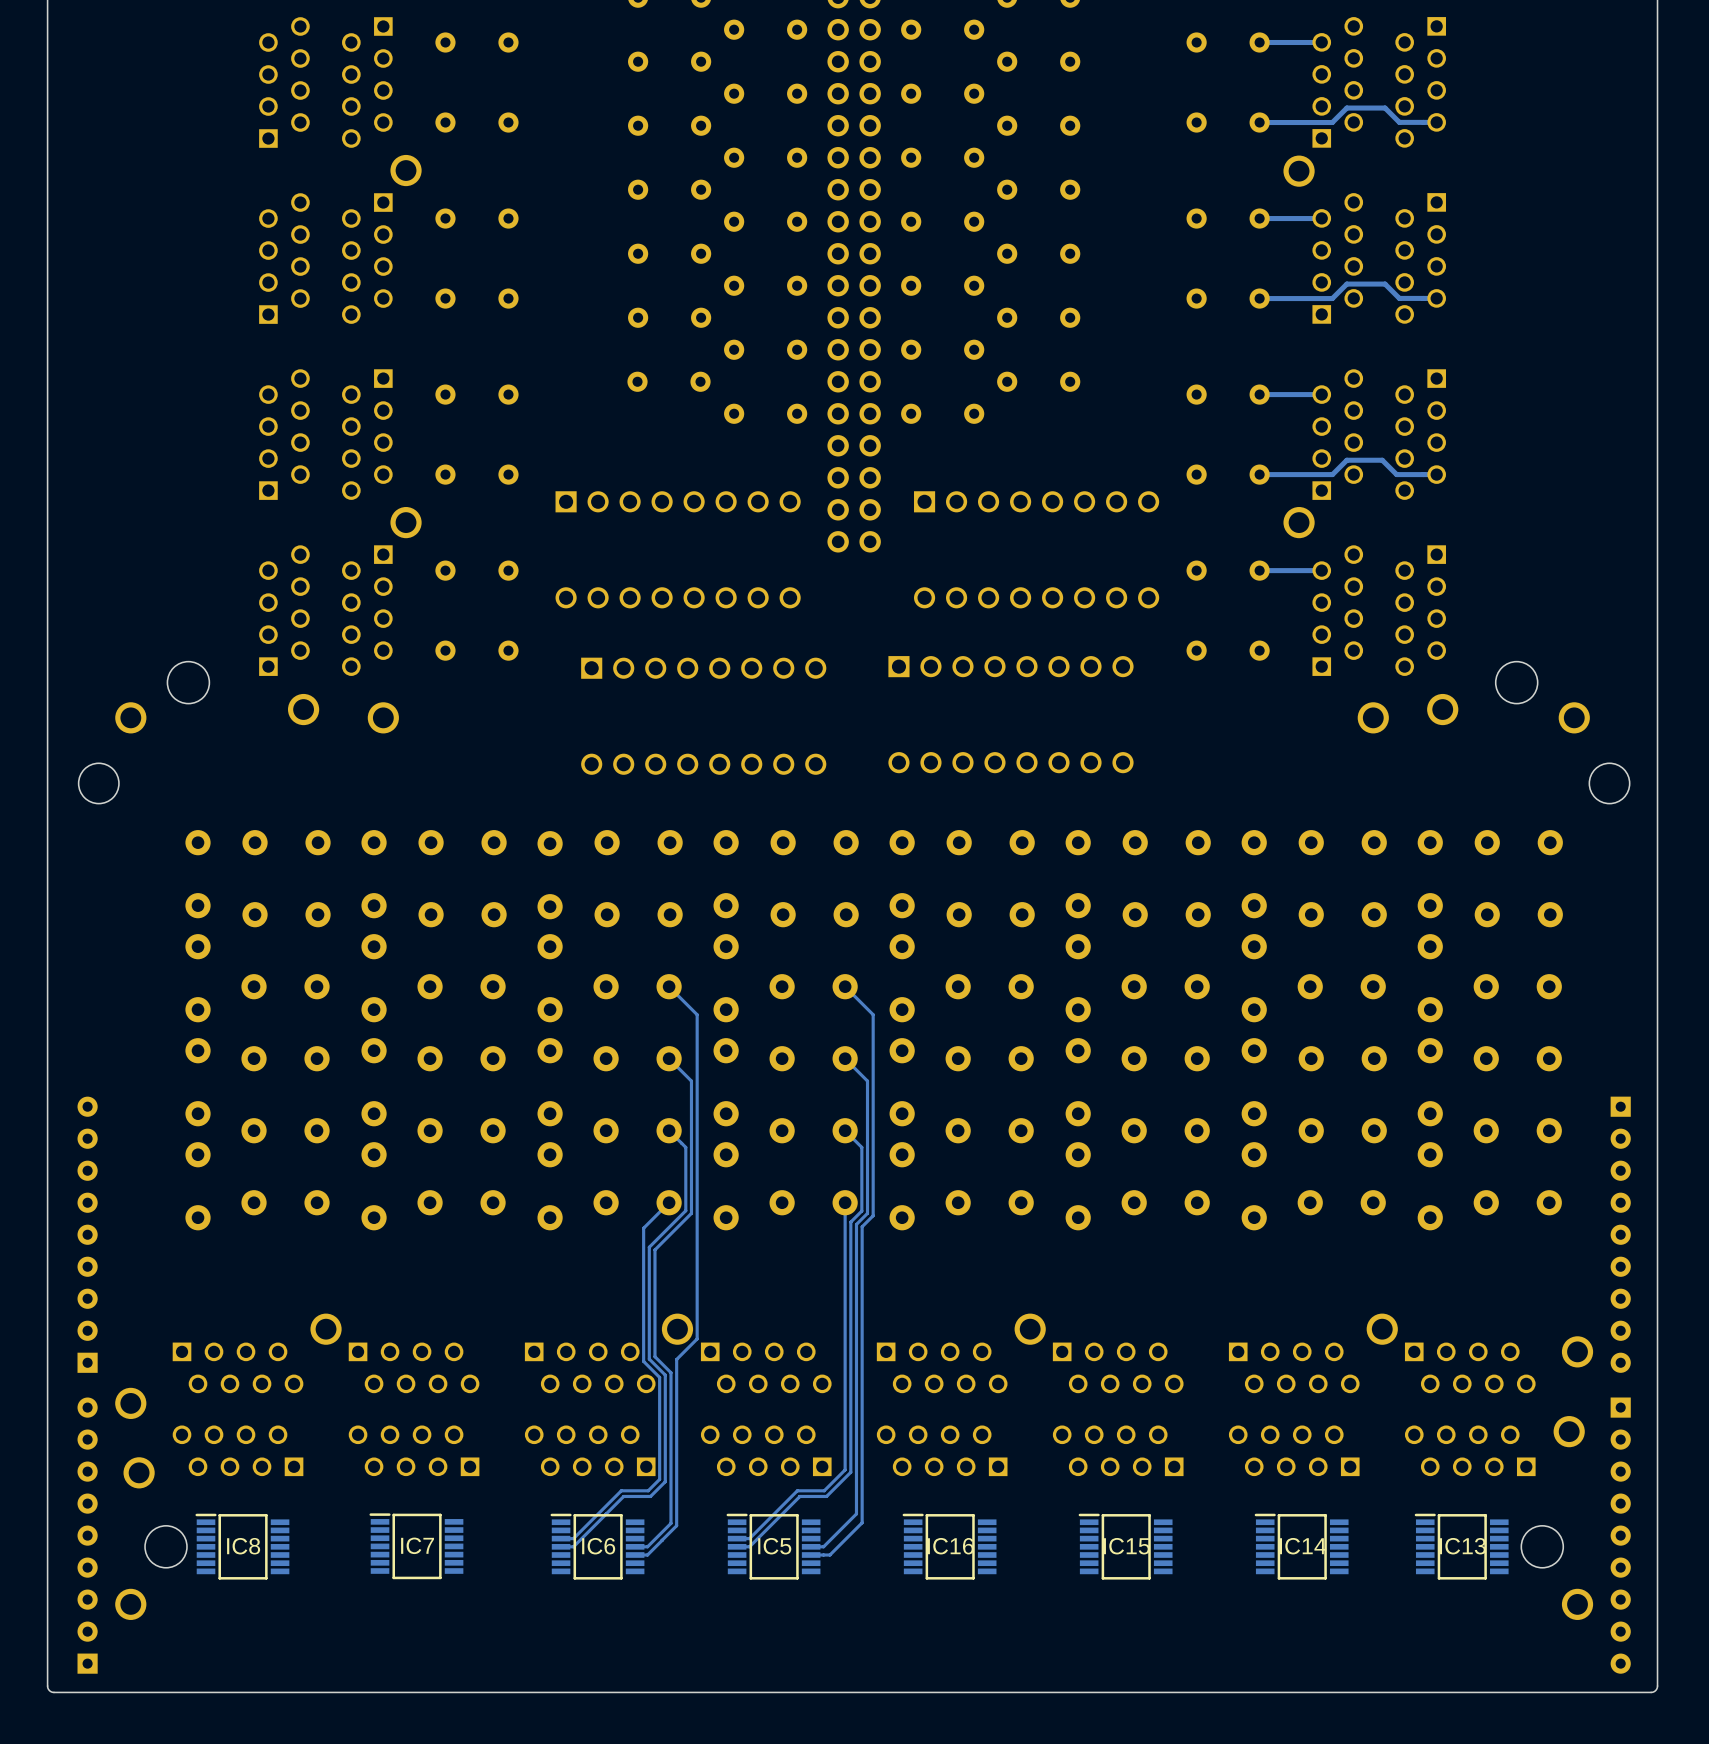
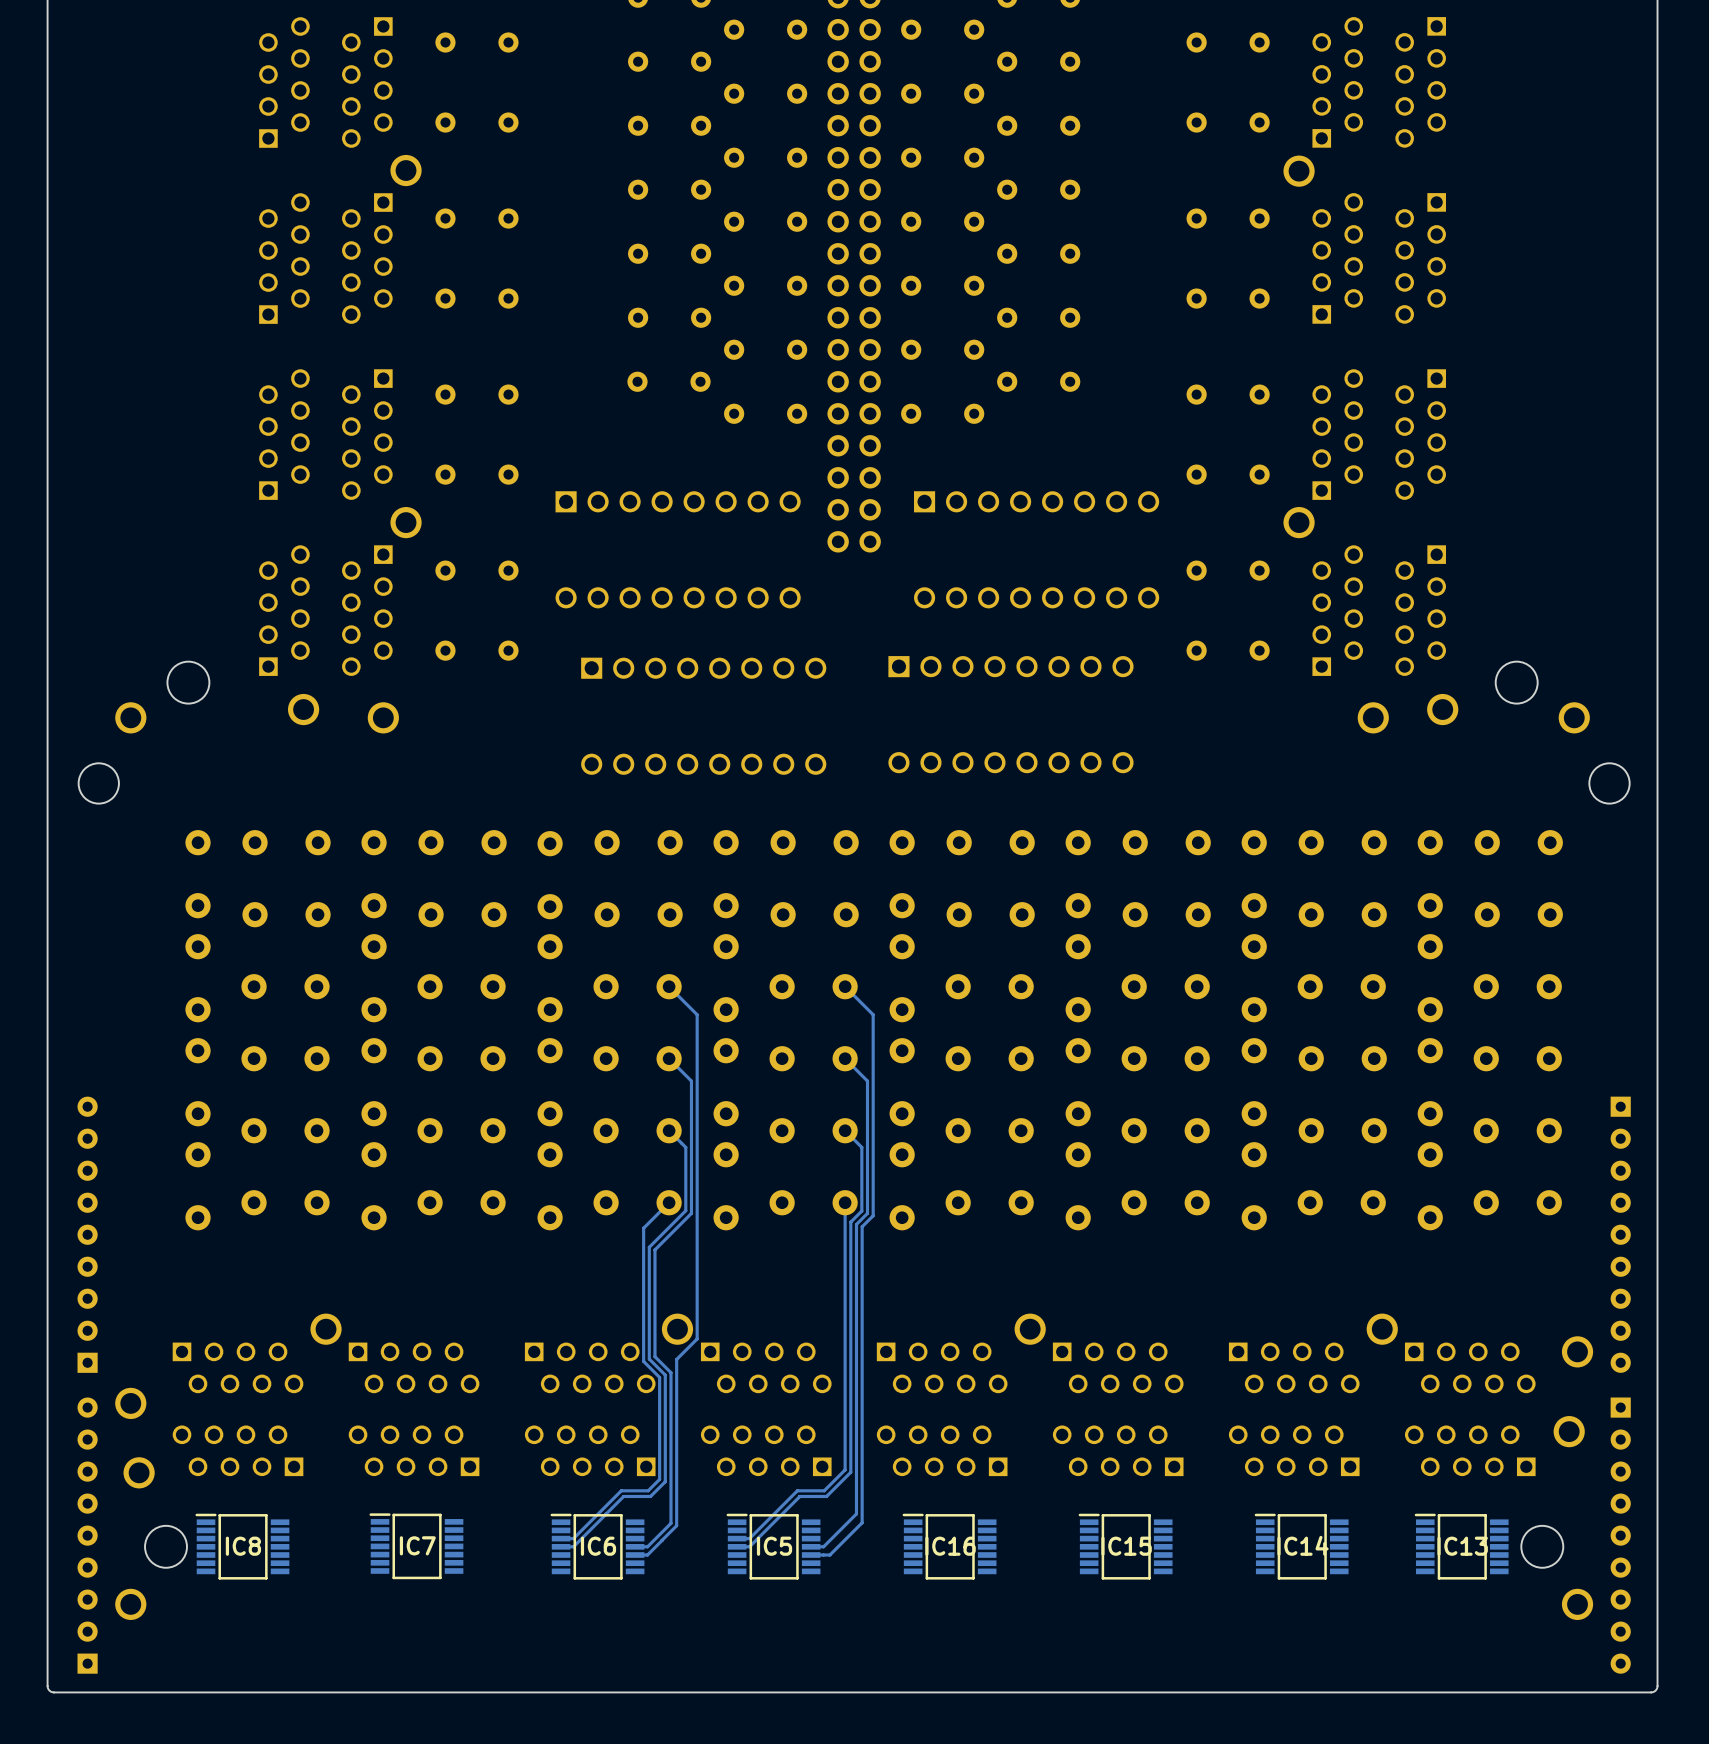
track: (1321, 42) (1259, 42) -> none
track: (1436, 122) (1399, 122) (1385, 108) (1346, 108) (1332, 122) (1259, 122) -> none
track: (1321, 218) (1259, 218) -> none
track: (1436, 298) (1399, 298) (1385, 284) (1346, 284) (1332, 298) (1259, 298) -> none
track: (1321, 394) (1259, 394) -> none
track: (1436, 474) (1396, 474) (1382, 460) (1346, 460) (1332, 474) (1259, 474) -> none
track: (1321, 570) (1259, 570) -> none

